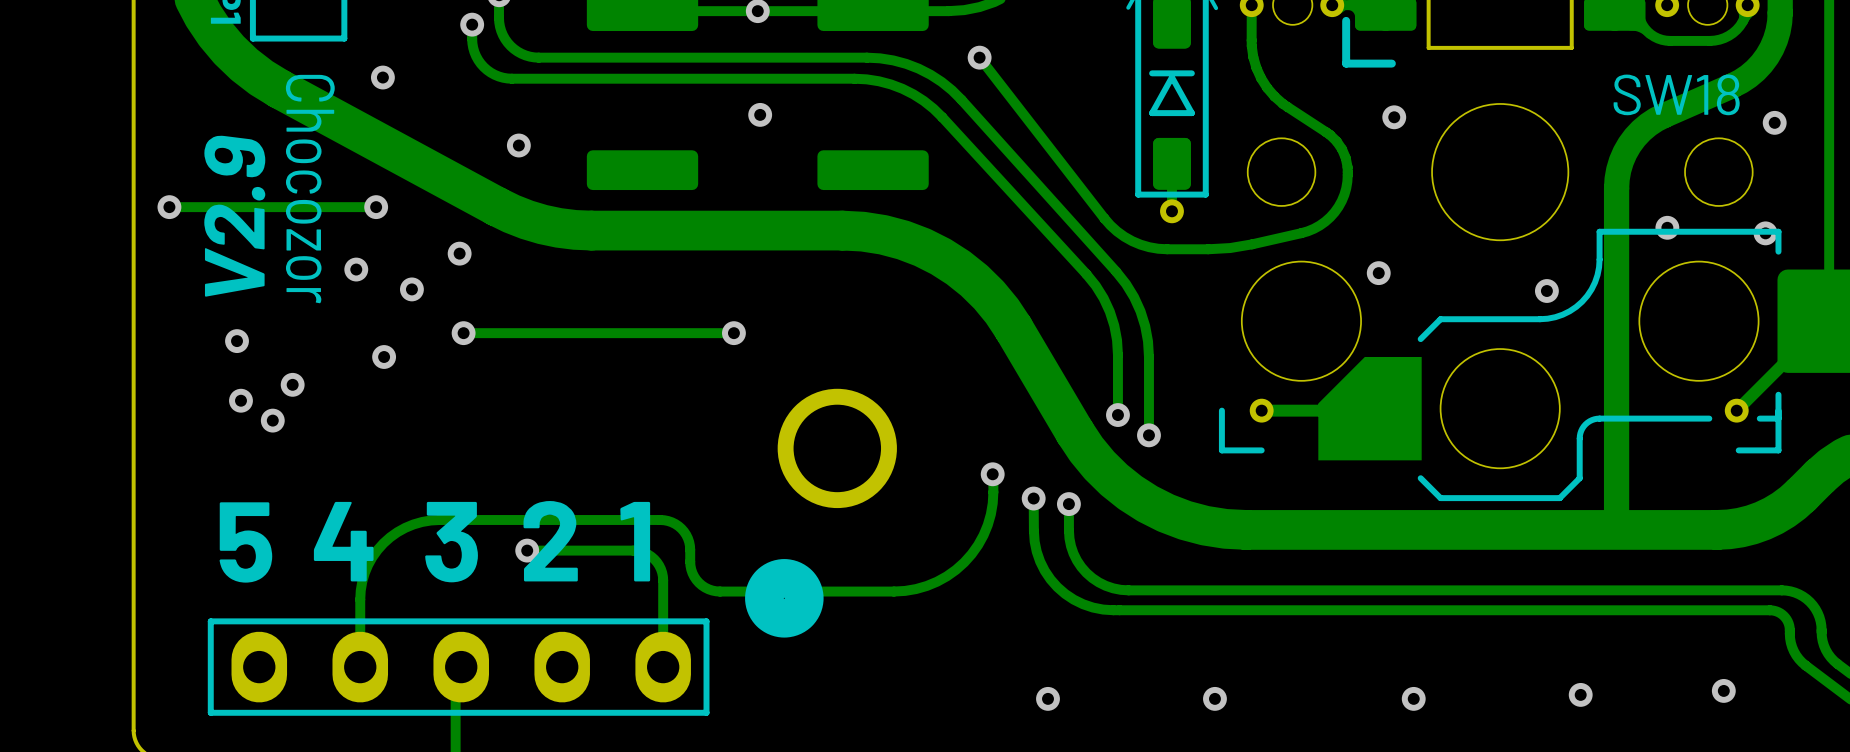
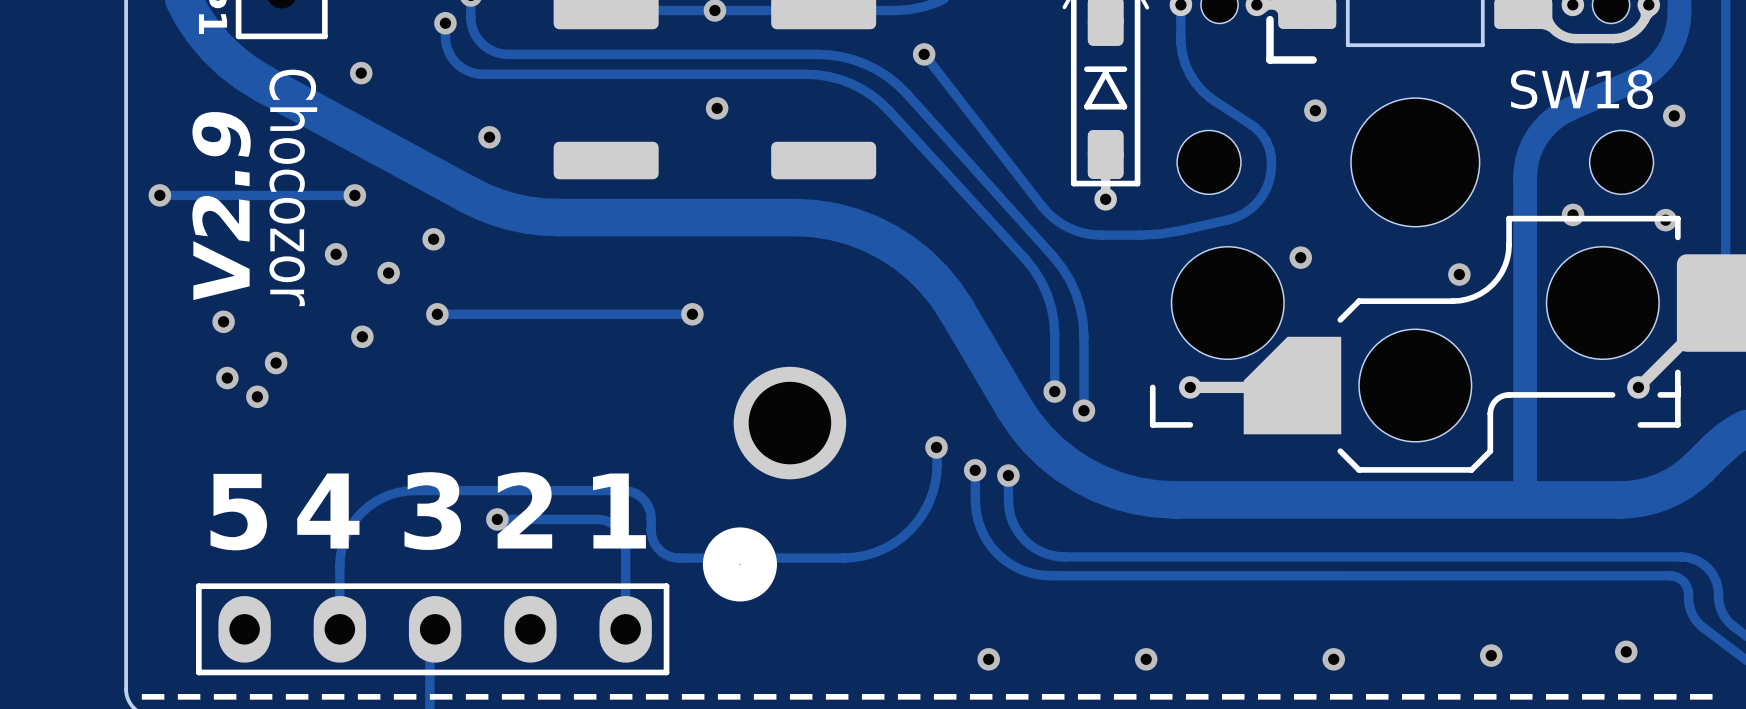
line: none -> (1712, 696) (141, 696)

